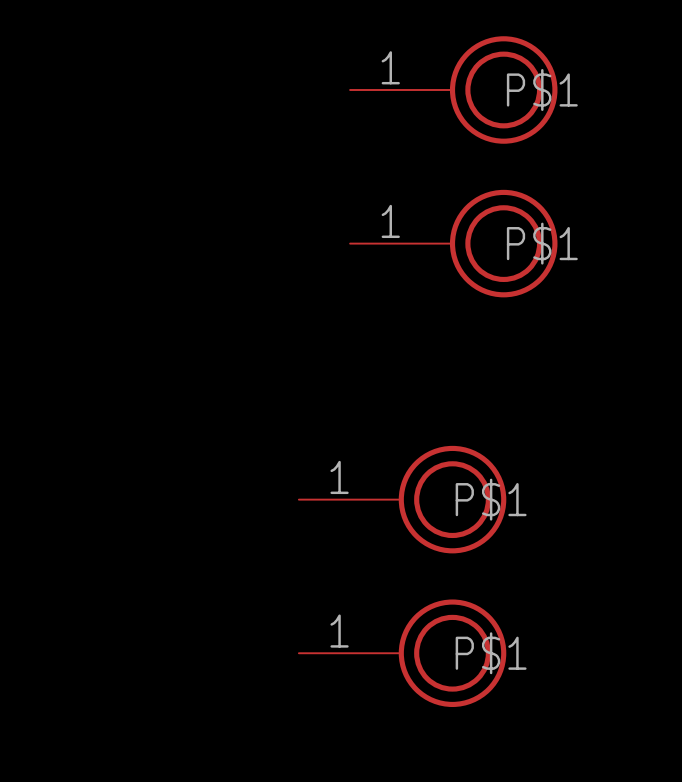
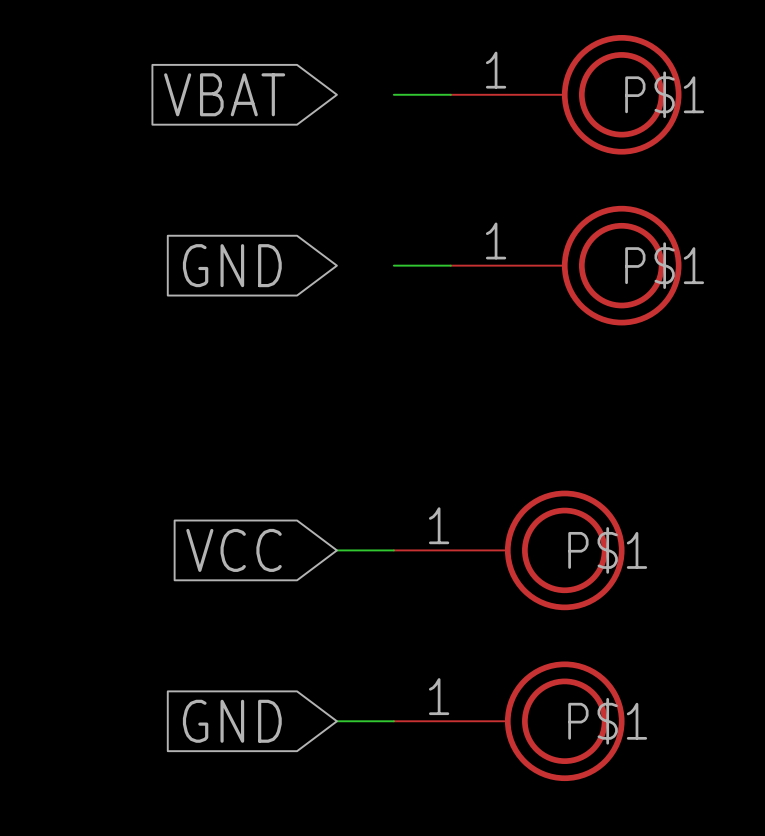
global label: none -> VBAT (224, 94)
wire: none -> (393, 94) (450, 94)
global label: none -> GND (232, 265)
wire: none -> (393, 265) (450, 265)
global label: none -> VCC (234, 550)
wire: none -> (336, 550) (393, 550)
global label: none -> GND (232, 721)
wire: none -> (336, 721) (393, 721)

